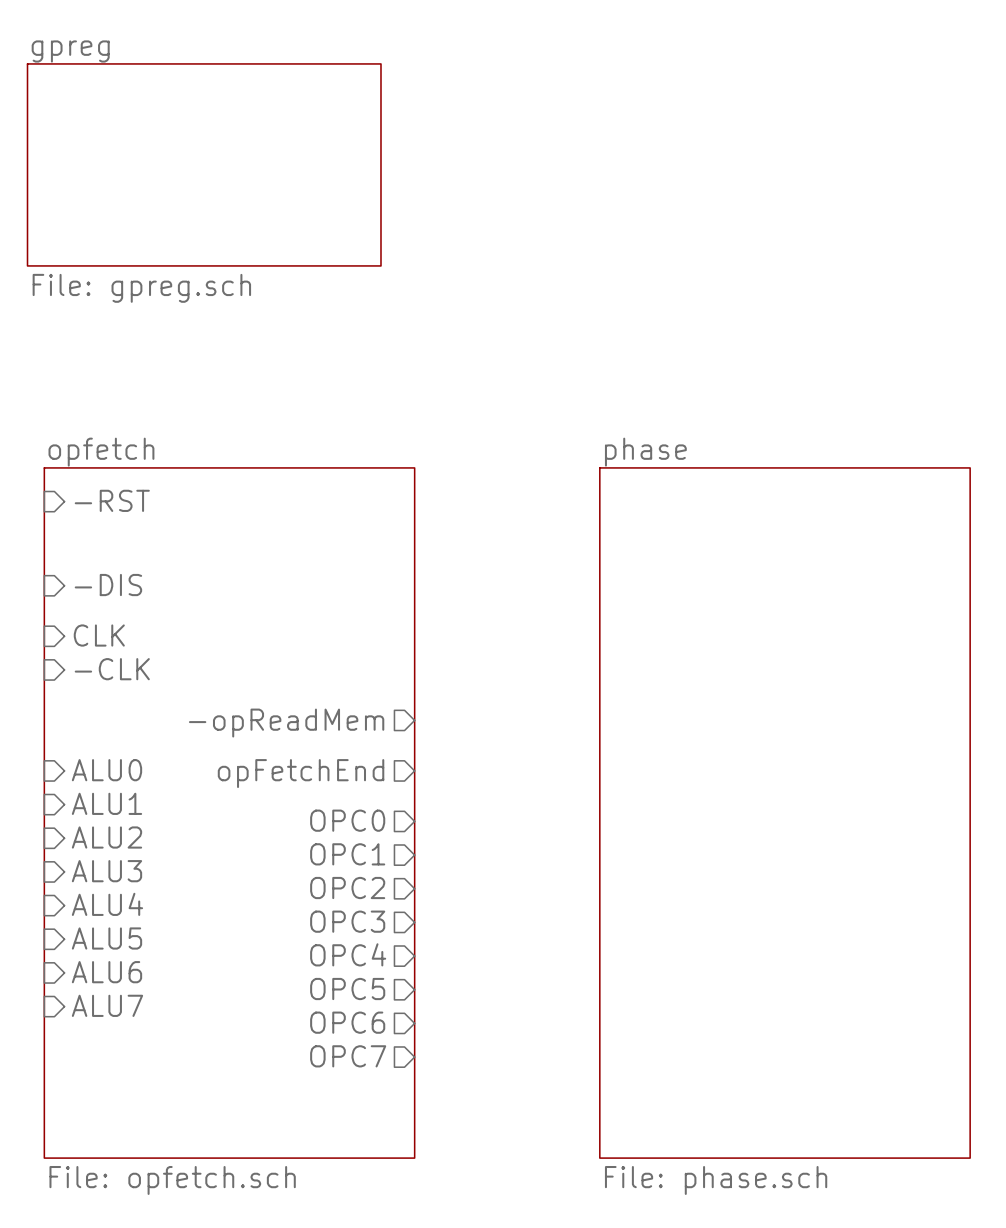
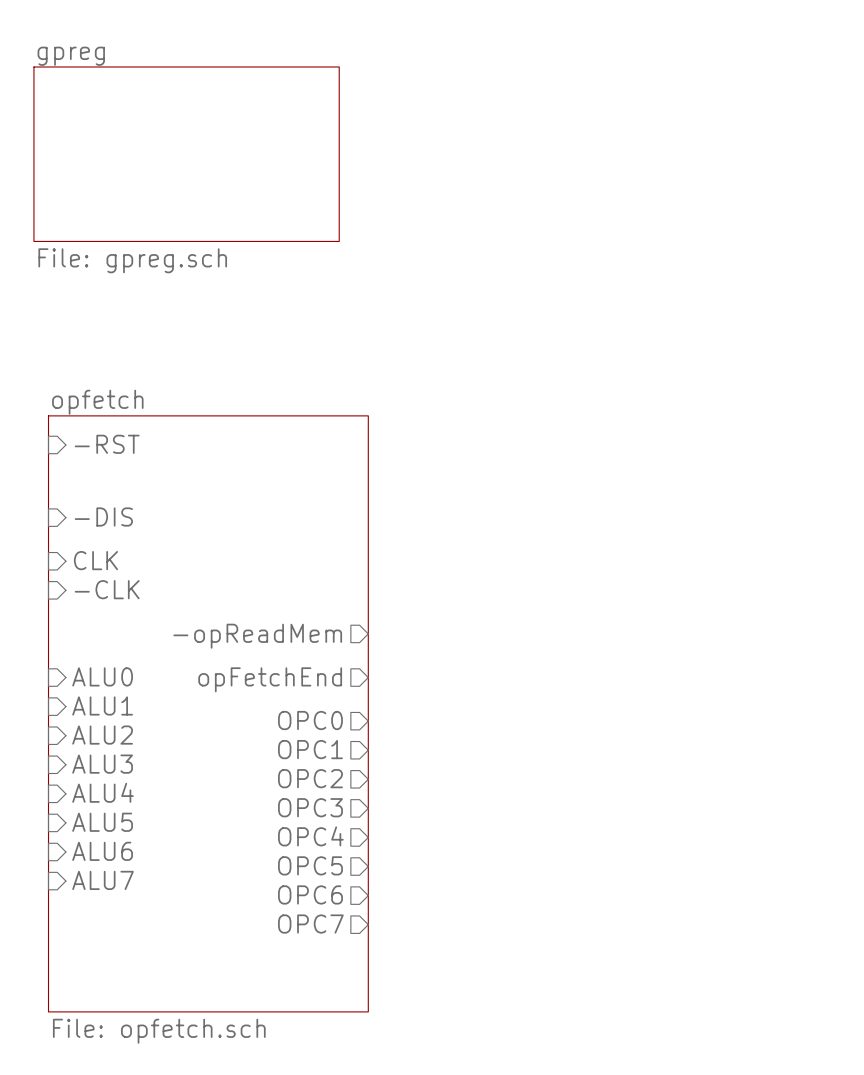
sheet phase: File: phase.sch (784, 813) -> none

